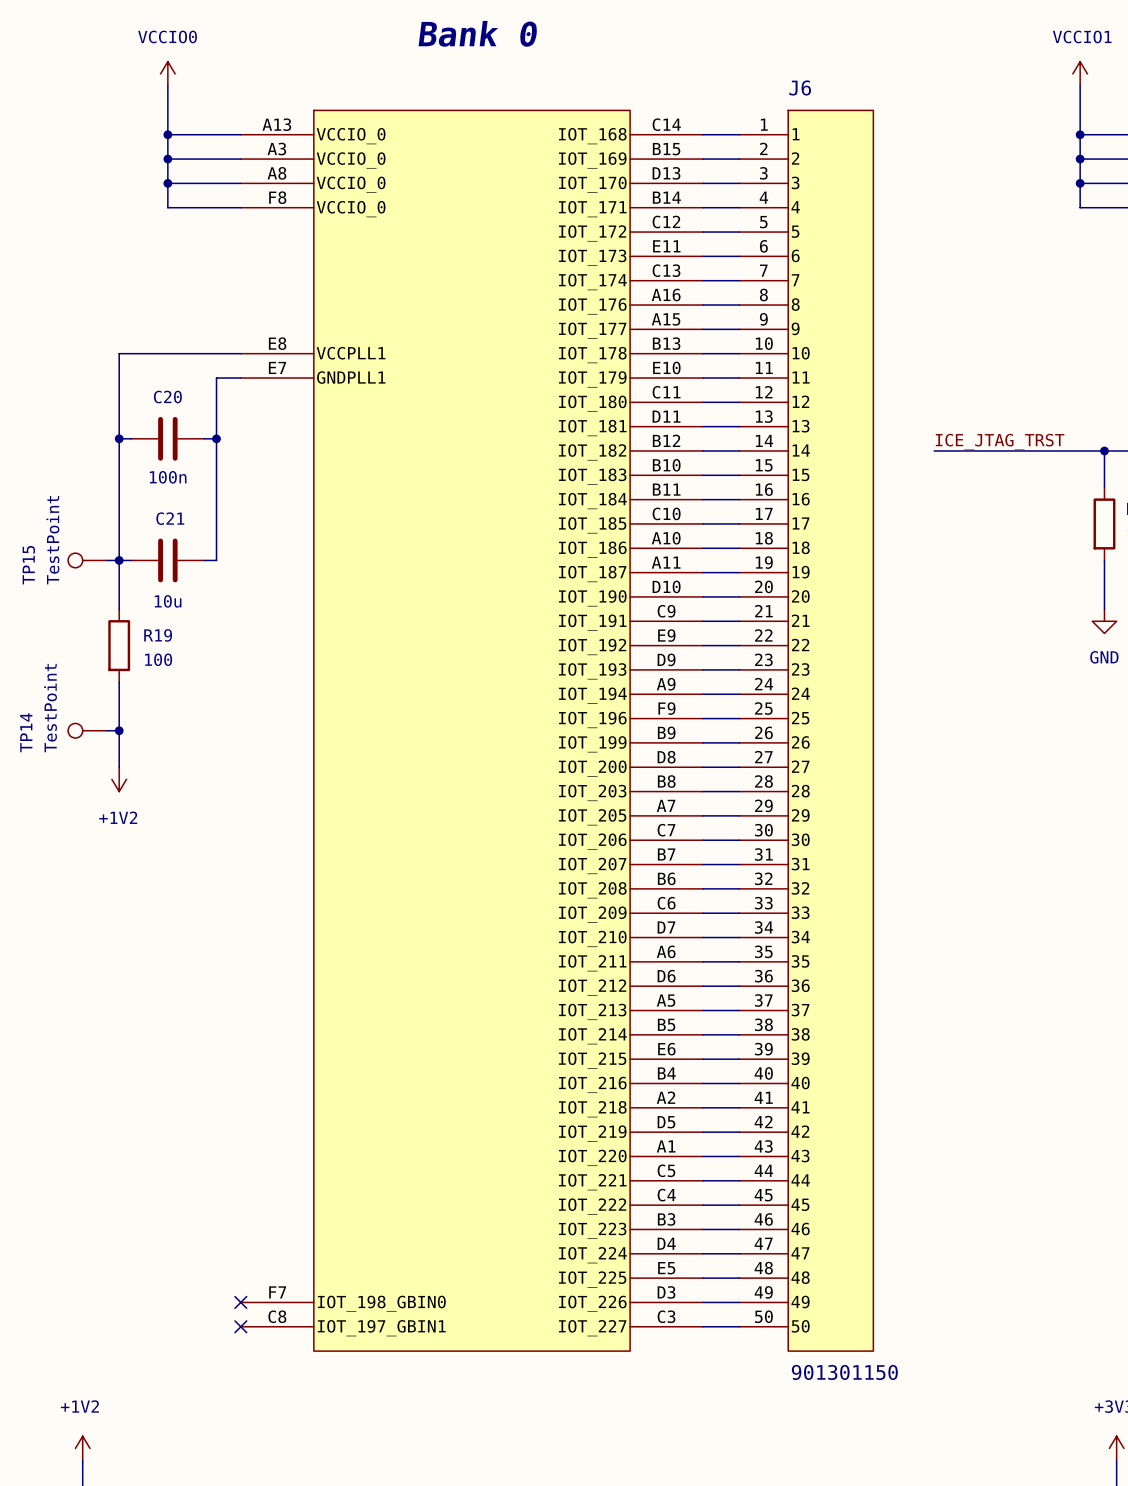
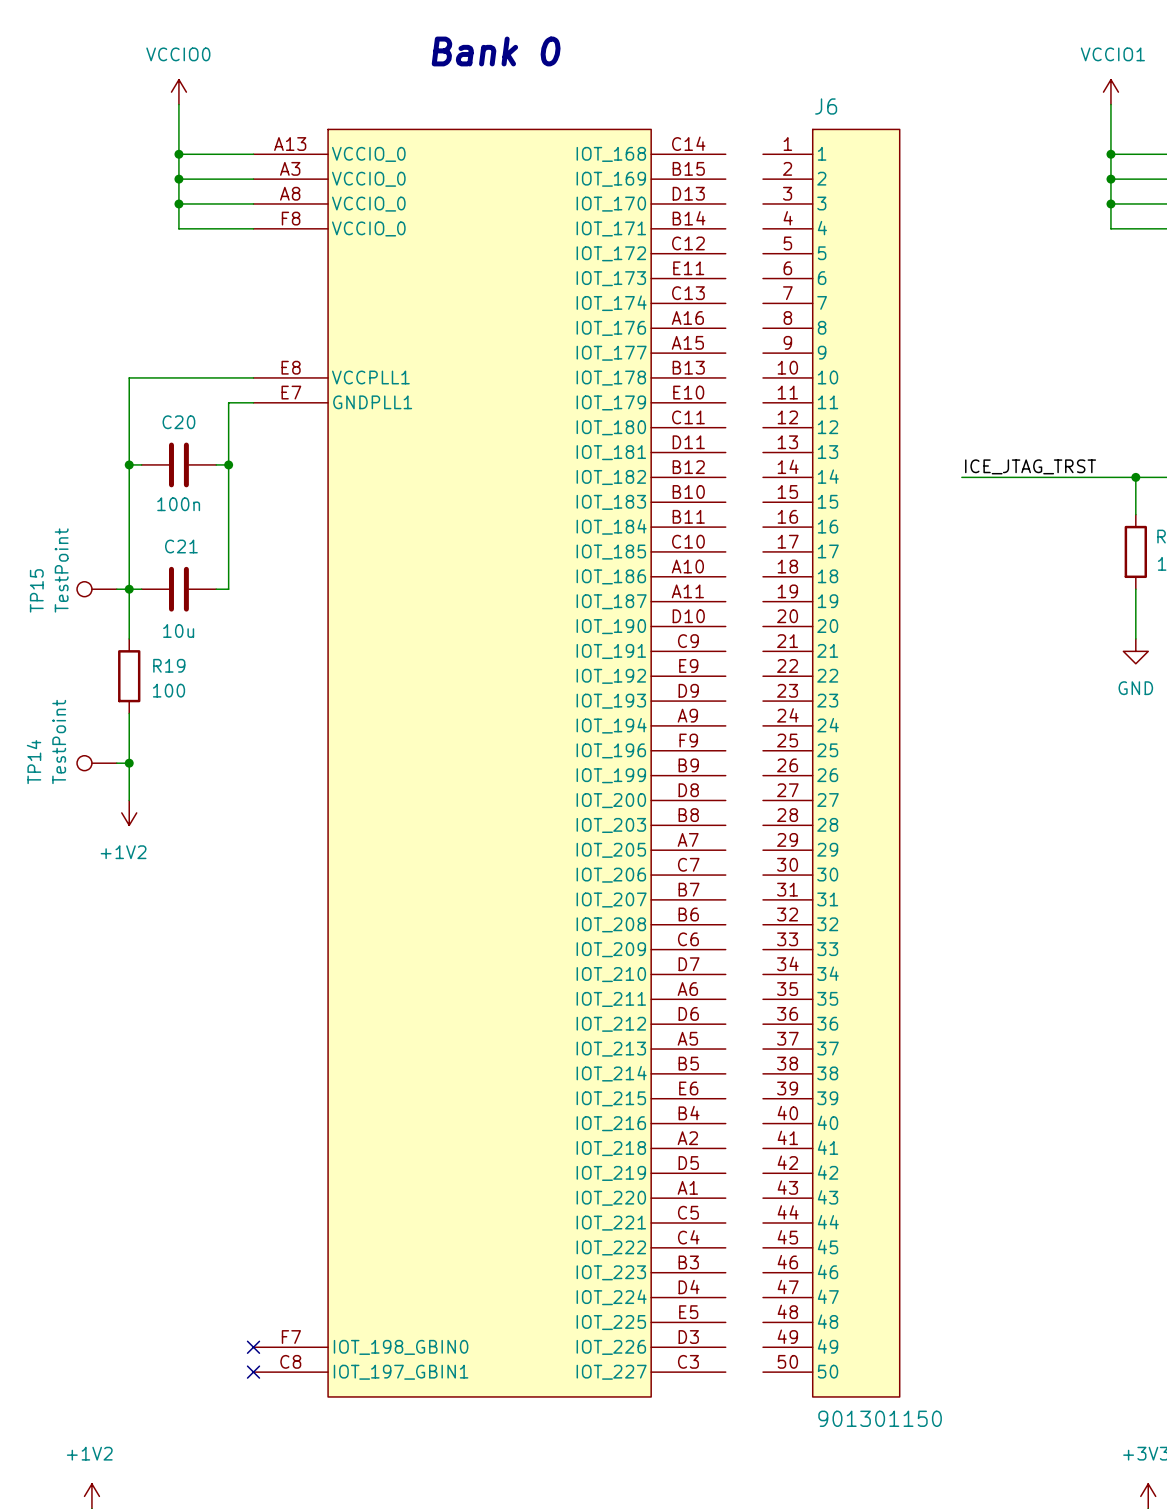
wire: (703, 134) (739, 134) -> none
wire: (703, 159) (739, 159) -> none
wire: (703, 183) (739, 183) -> none
wire: (703, 207) (739, 207) -> none
wire: (703, 232) (739, 232) -> none
wire: (703, 256) (739, 256) -> none
wire: (703, 280) (739, 280) -> none
wire: (703, 305) (739, 305) -> none
wire: (703, 329) (739, 329) -> none
wire: (703, 353) (739, 353) -> none
wire: (703, 378) (739, 378) -> none
wire: (703, 402) (739, 402) -> none
wire: (703, 426) (739, 426) -> none
wire: (703, 450) (739, 450) -> none
wire: (703, 475) (739, 475) -> none
wire: (703, 499) (739, 499) -> none
wire: (703, 523) (739, 523) -> none
wire: (703, 548) (739, 548) -> none
wire: (703, 572) (739, 572) -> none
wire: (703, 596) (739, 596) -> none
wire: (703, 621) (739, 621) -> none
wire: (703, 645) (739, 645) -> none
wire: (703, 669) (739, 669) -> none
wire: (703, 694) (739, 694) -> none
wire: (703, 718) (739, 718) -> none
wire: (703, 742) (739, 742) -> none
wire: (703, 767) (739, 767) -> none
wire: (703, 791) (739, 791) -> none
wire: (703, 815) (739, 815) -> none
wire: (703, 840) (739, 840) -> none
wire: (703, 864) (739, 864) -> none
wire: (703, 888) (739, 888) -> none
wire: (703, 913) (739, 913) -> none
wire: (703, 937) (739, 937) -> none
wire: (703, 961) (739, 961) -> none
wire: (703, 986) (739, 986) -> none
wire: (703, 1010) (739, 1010) -> none
wire: (703, 1034) (739, 1034) -> none
wire: (703, 1059) (739, 1059) -> none
wire: (703, 1083) (739, 1083) -> none
wire: (703, 1107) (739, 1107) -> none
wire: (703, 1132) (739, 1132) -> none
wire: (703, 1156) (739, 1156) -> none
wire: (703, 1180) (739, 1180) -> none
wire: (703, 1205) (739, 1205) -> none
wire: (703, 1229) (739, 1229) -> none
wire: (703, 1253) (739, 1253) -> none
wire: (703, 1278) (739, 1278) -> none
wire: (703, 1302) (739, 1302) -> none
wire: (703, 1326) (739, 1326) -> none

